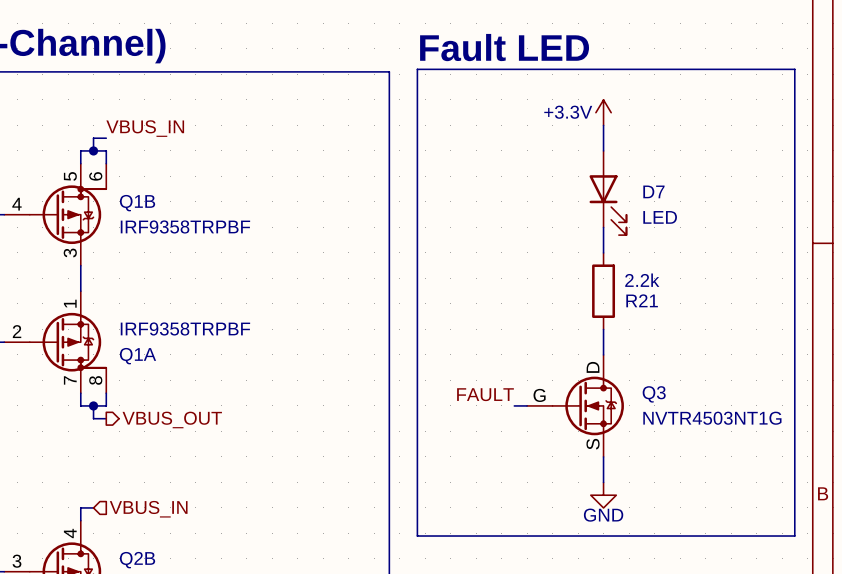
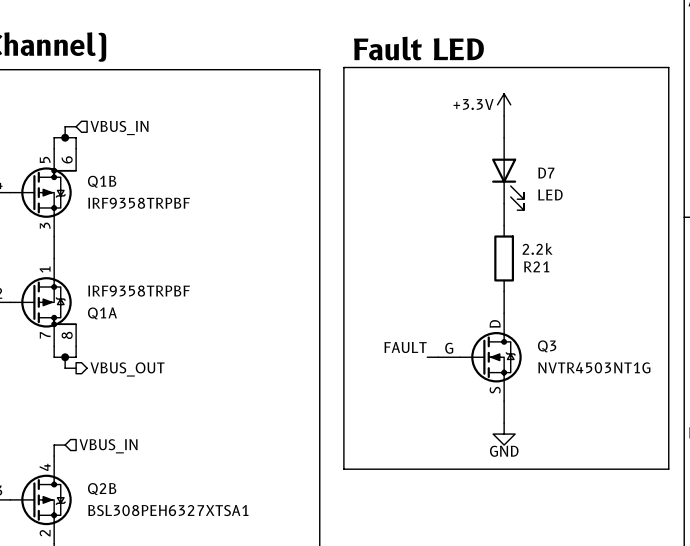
label: VBUS_IN (145, 128) -> none
hierarchical label: none -> VBUS_IN (119, 128)

